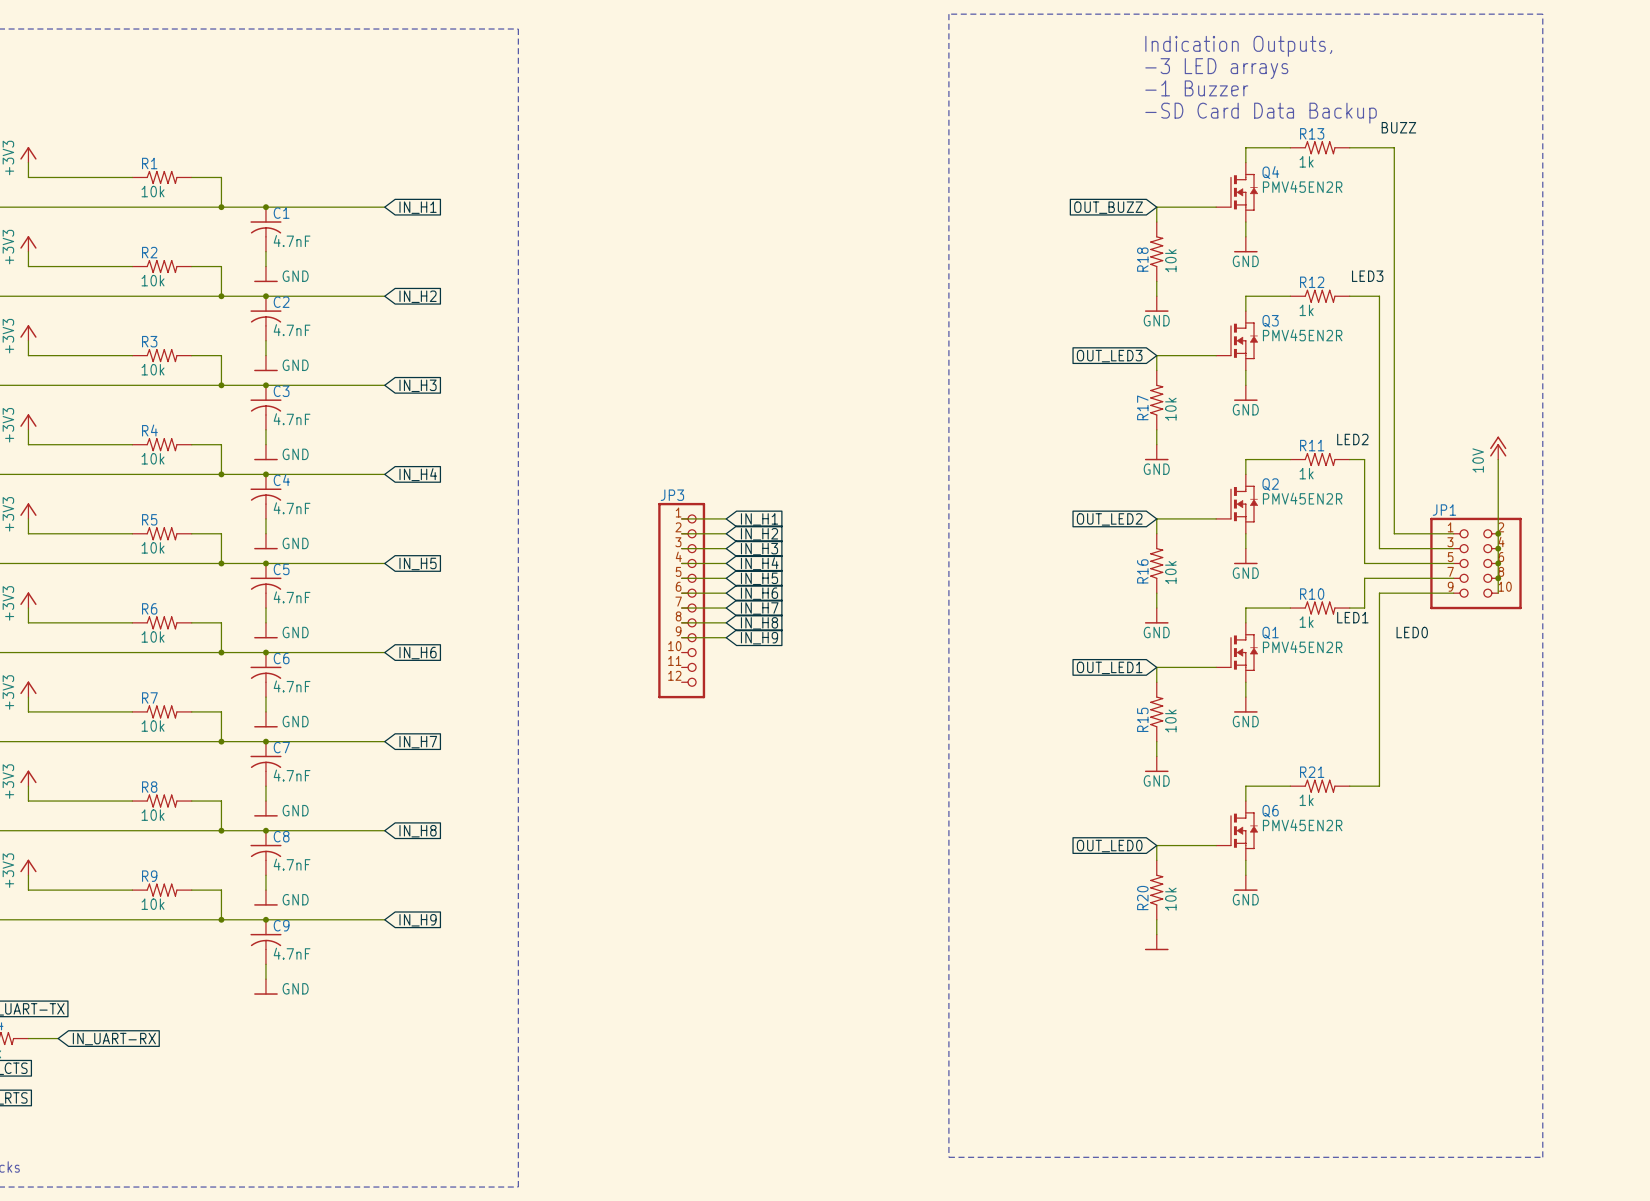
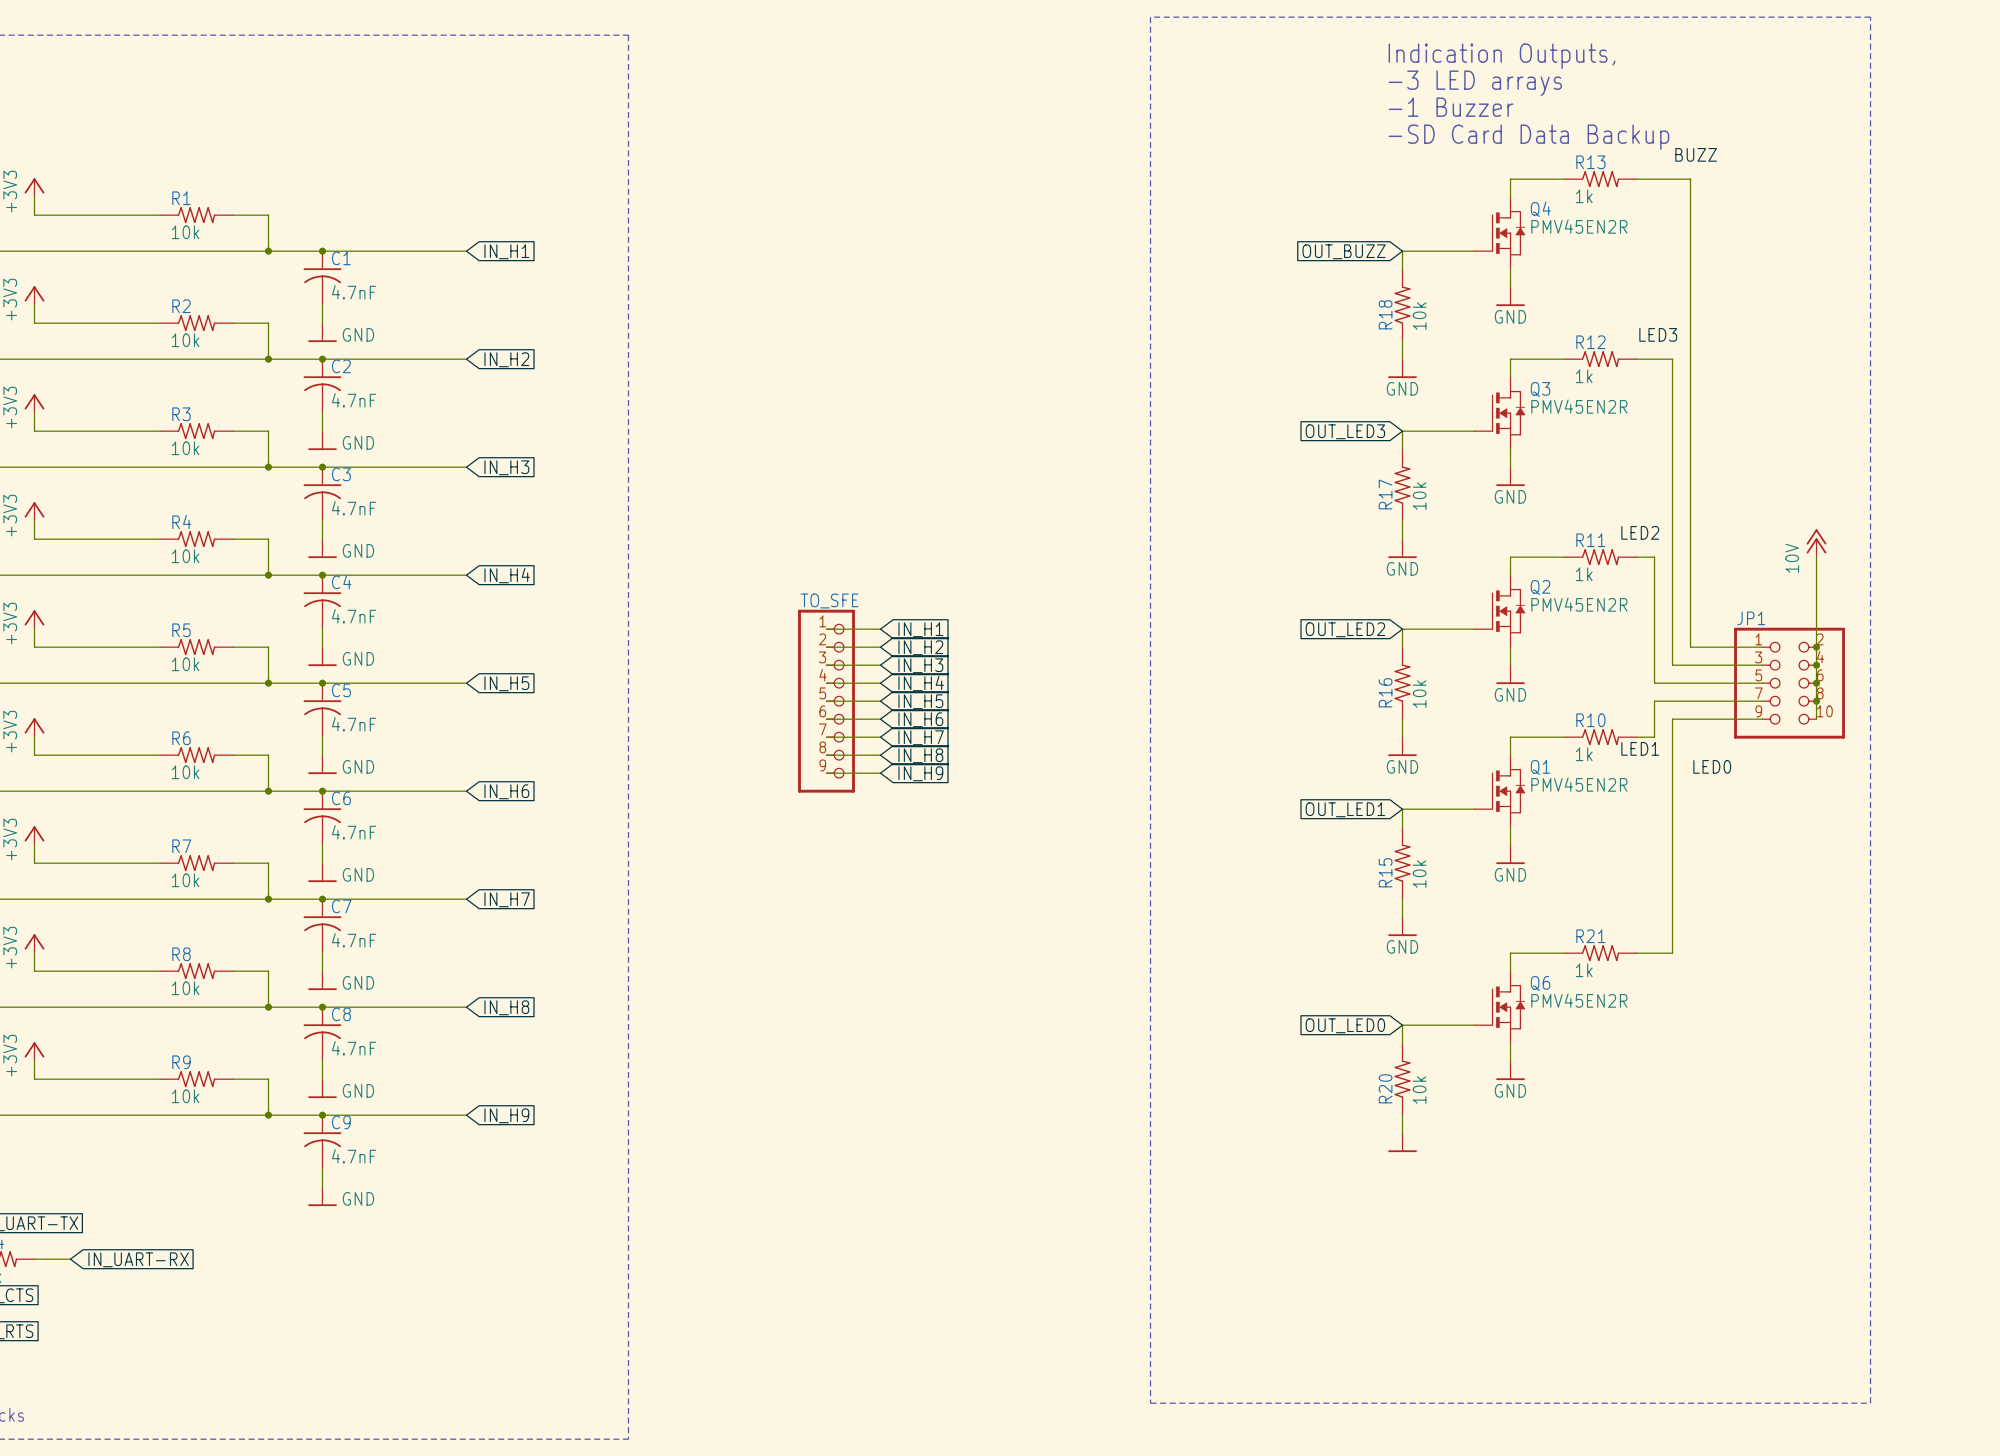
TO_SFE: none -> (826, 701)
JP3: (681, 600) -> none

